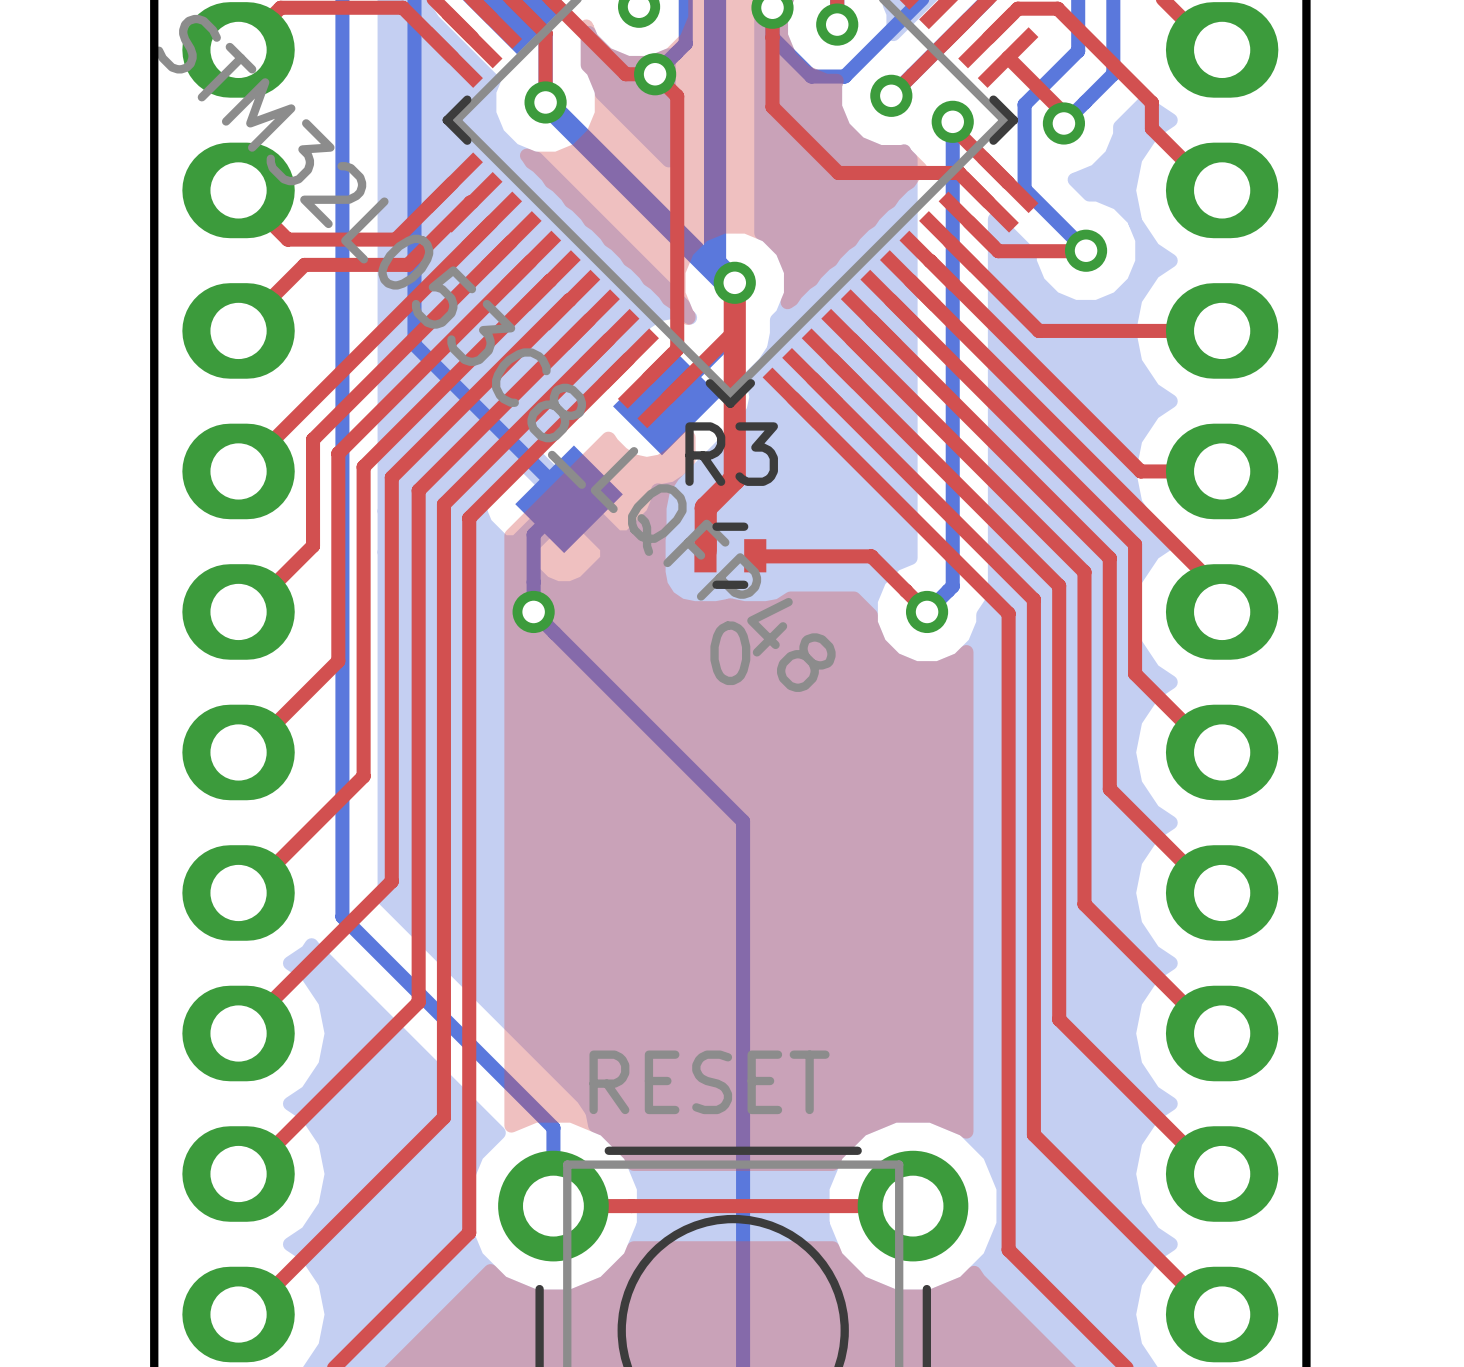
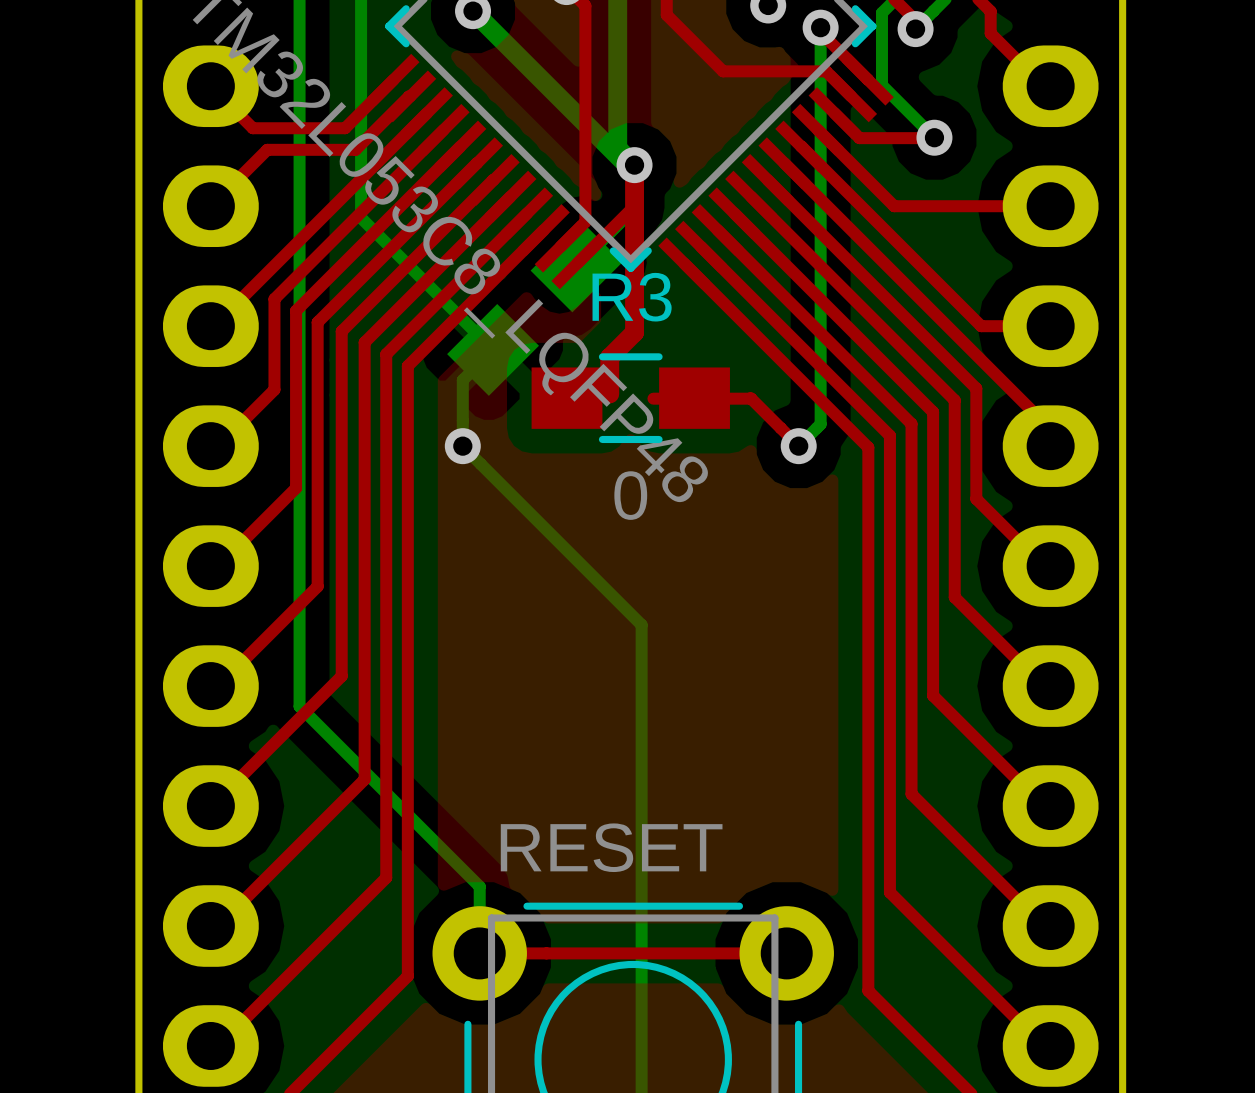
R3 footprint: [694, 522, 767, 589] -> [531, 353, 730, 444]

